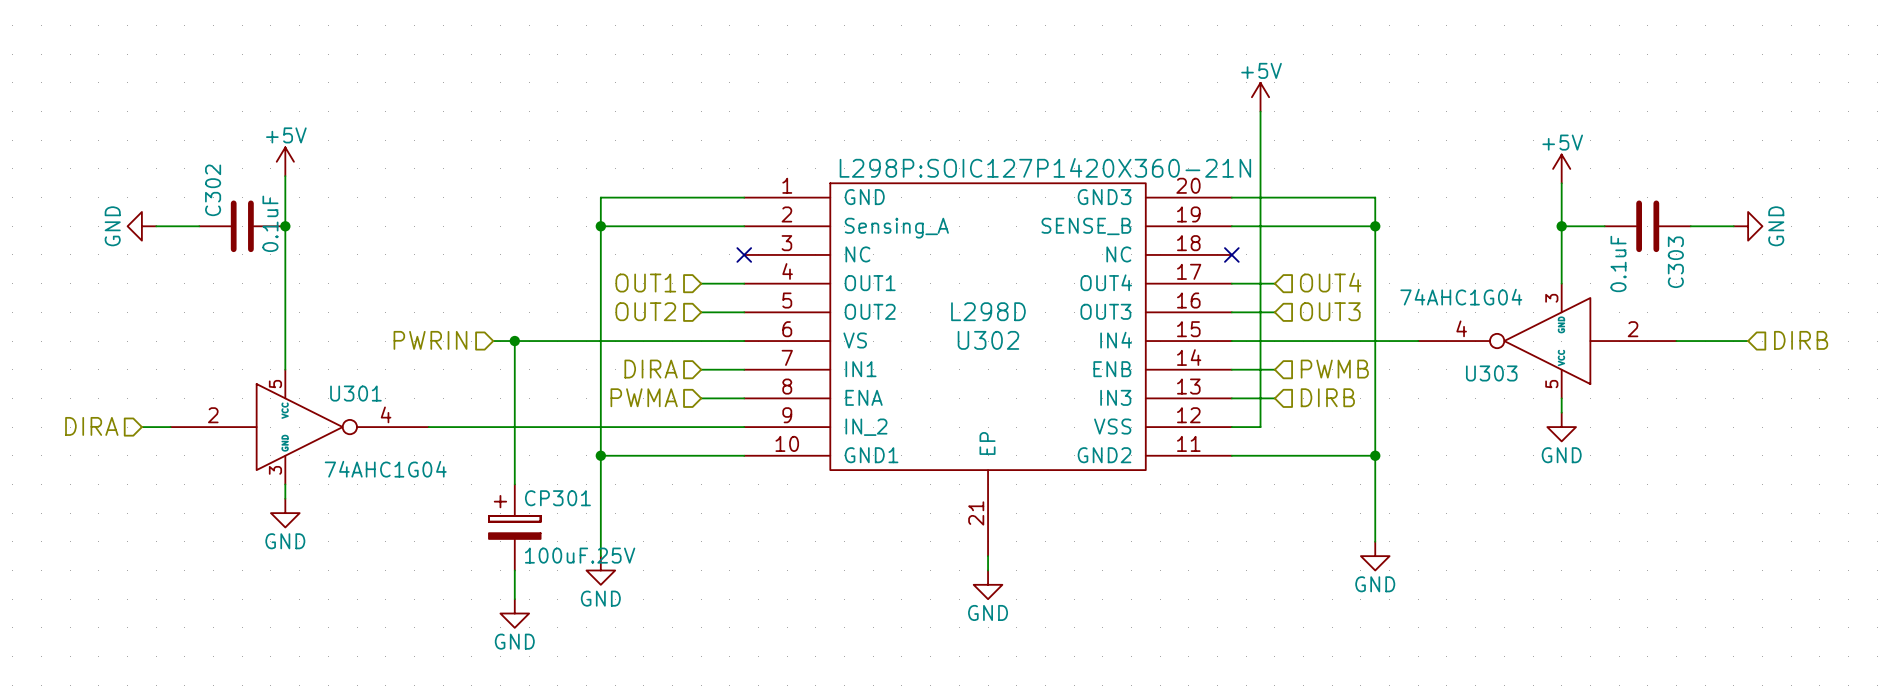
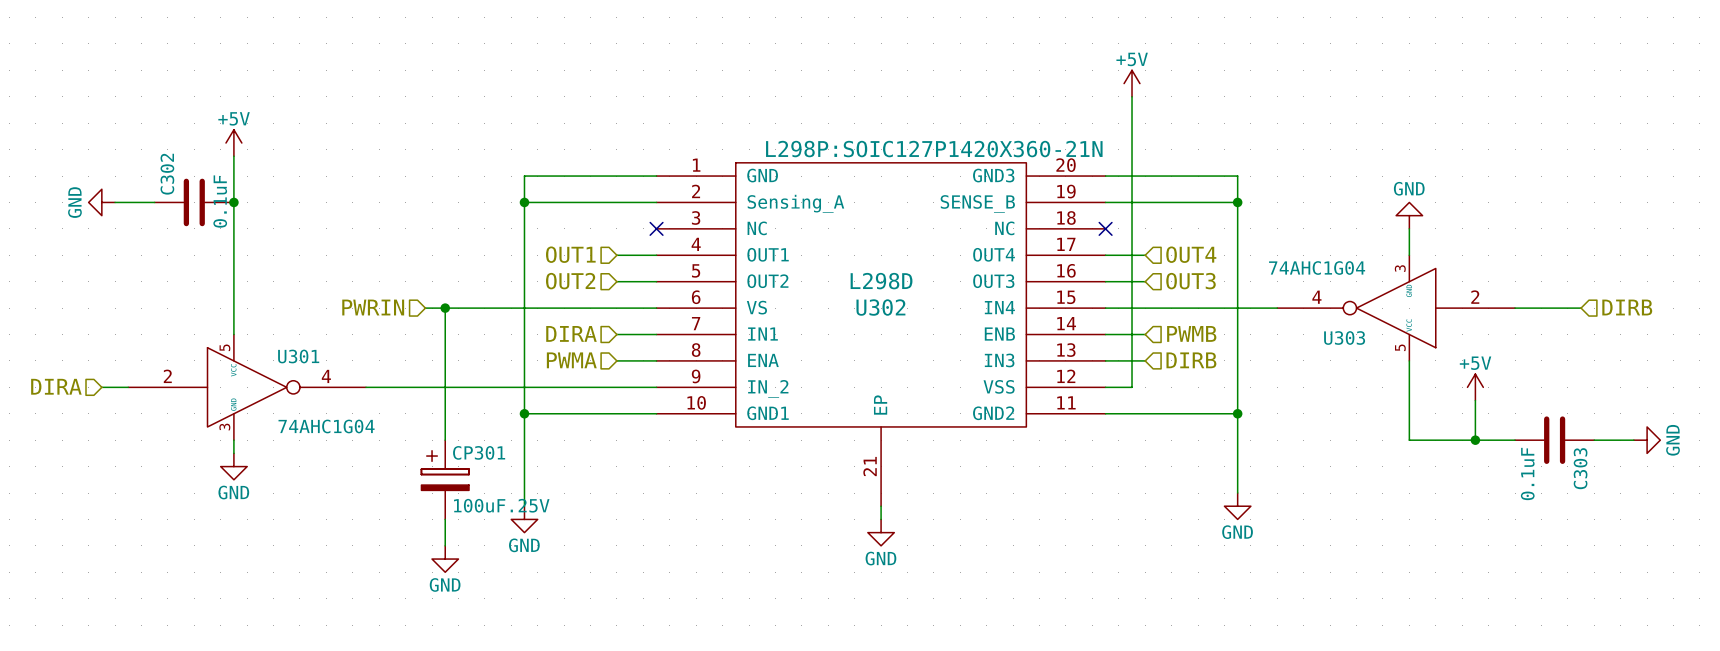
power symbol position: +5V (1561, 168) -> +5V (1475, 387)
wire: (1561, 183) (1561, 254) -> none
wire: (1561, 226) (1604, 226) -> none
junction: (1561, 226) -> none
C303 position: (1647, 226) -> (1554, 440)
wire: (1690, 226) (1733, 226) -> (1594, 440) (1633, 440)
power symbol: GND (1748, 226) -> none
power symbol: none -> GND (1409, 215)
wire: none -> (1409, 374) (1409, 440) (1515, 440)
power symbol: GND (1561, 427) -> none
wire: none -> (1475, 400) (1475, 440)
junction: none -> (1475, 440)
power symbol: none -> GND (1647, 440)

